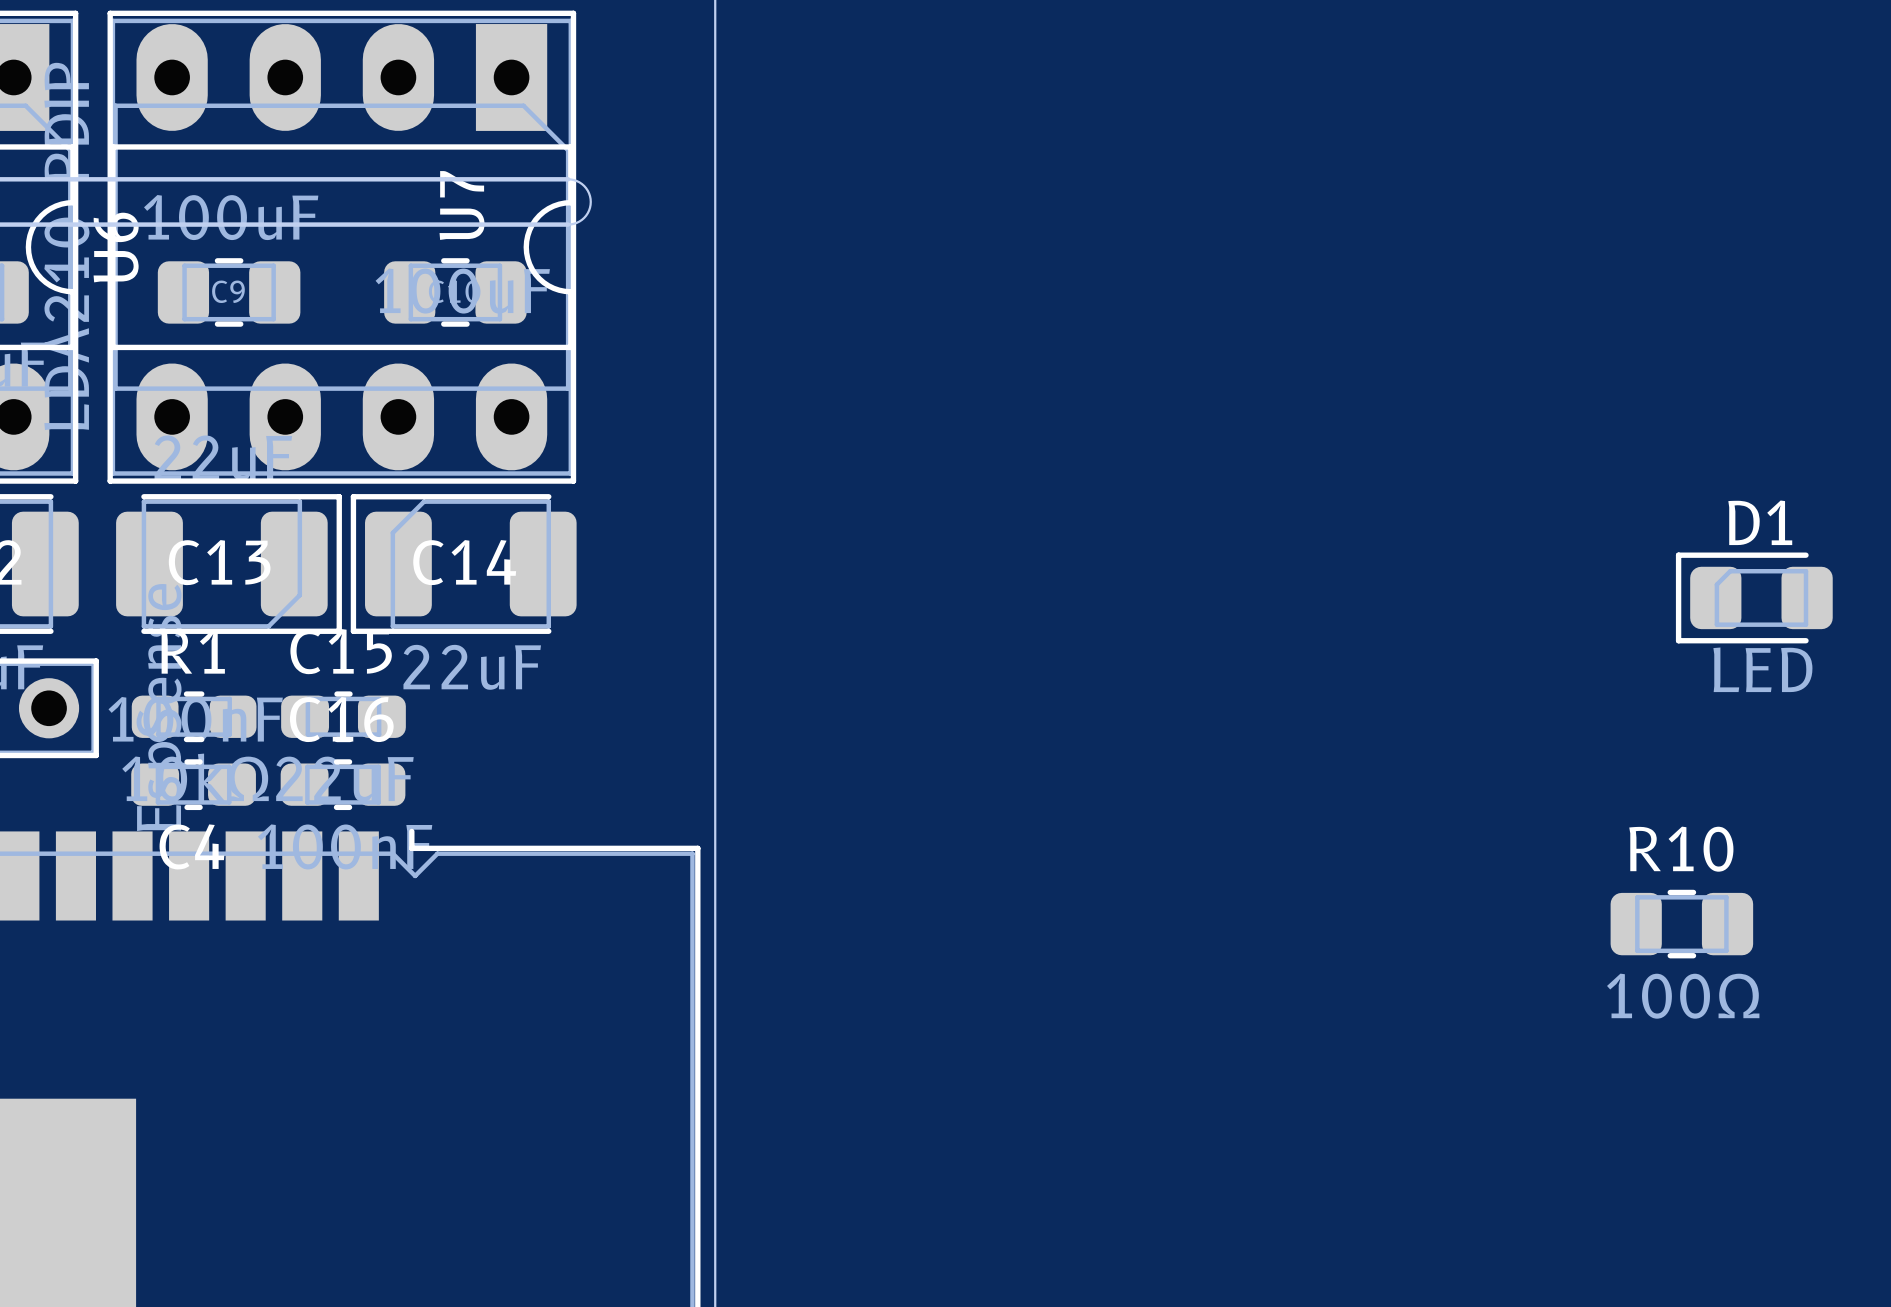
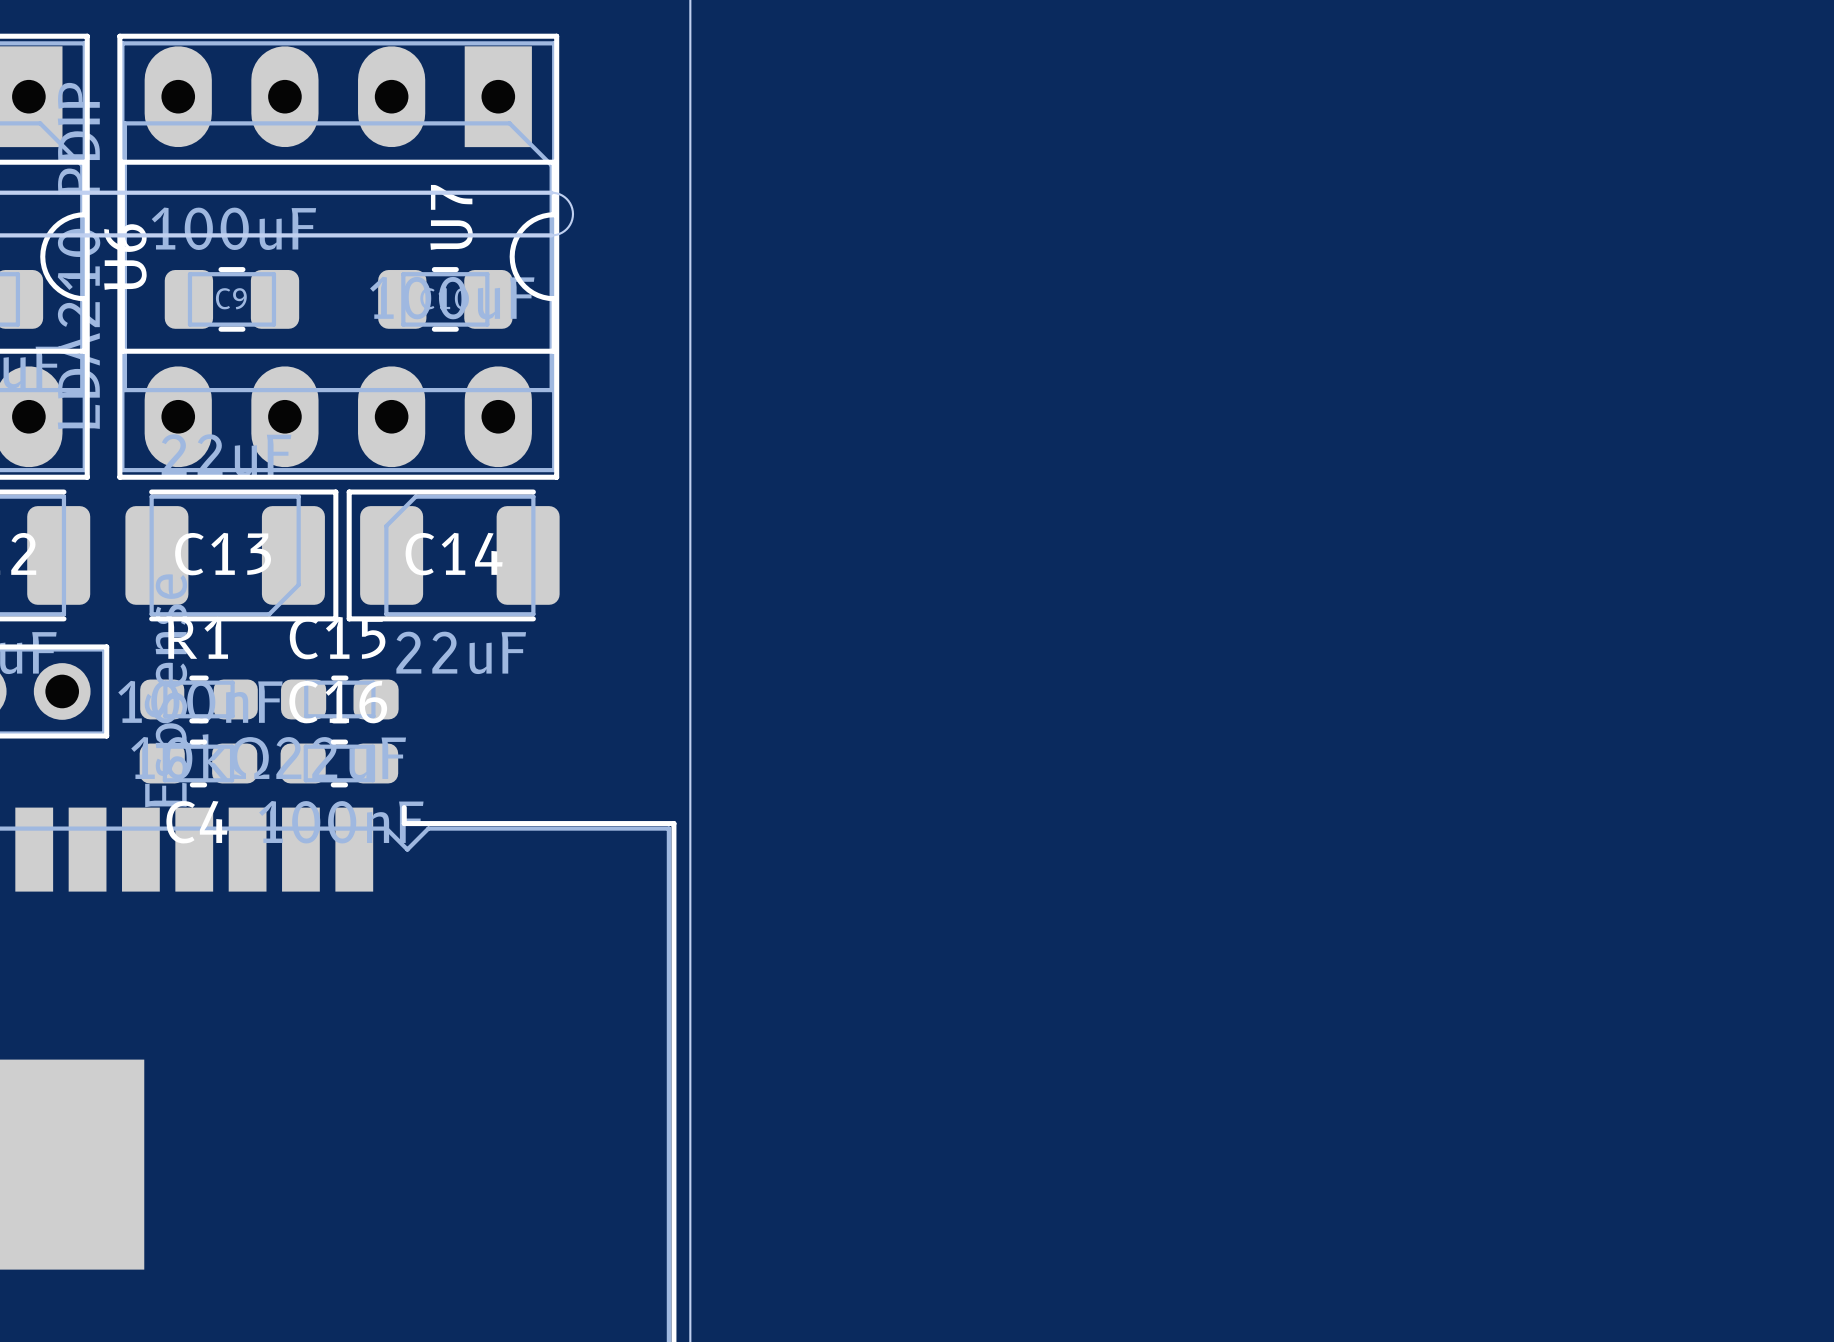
D1: LED (1754, 597) -> none
R10: 100Ω (1681, 924) -> none

